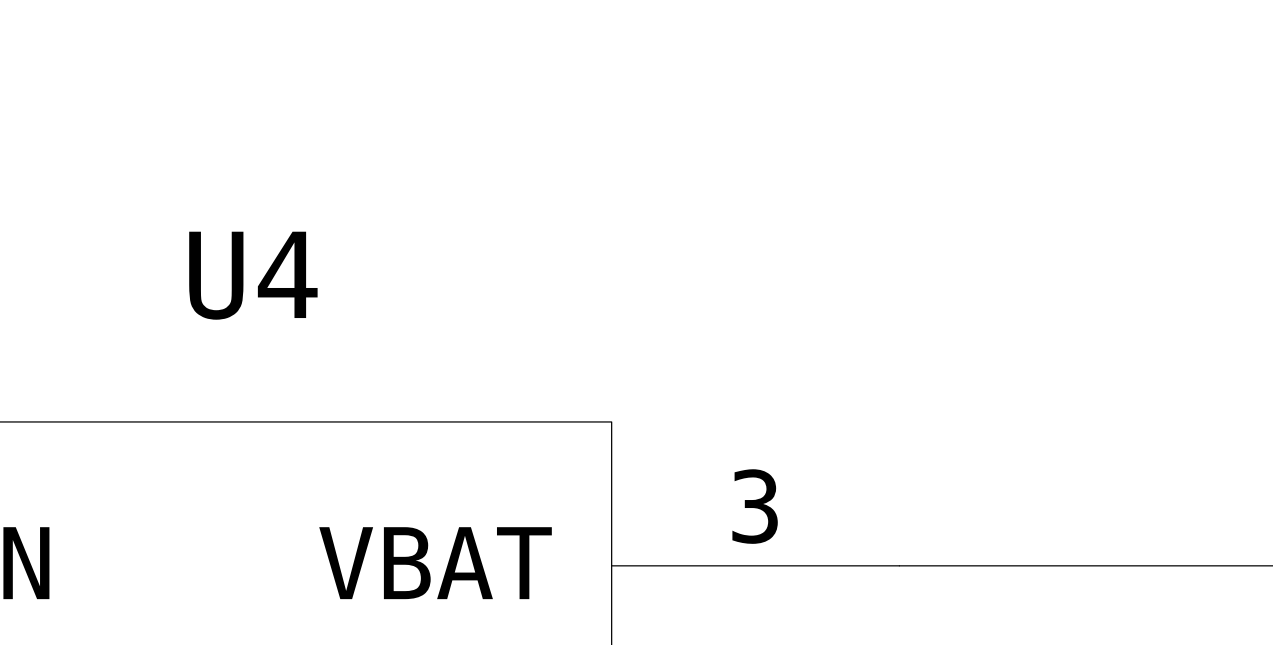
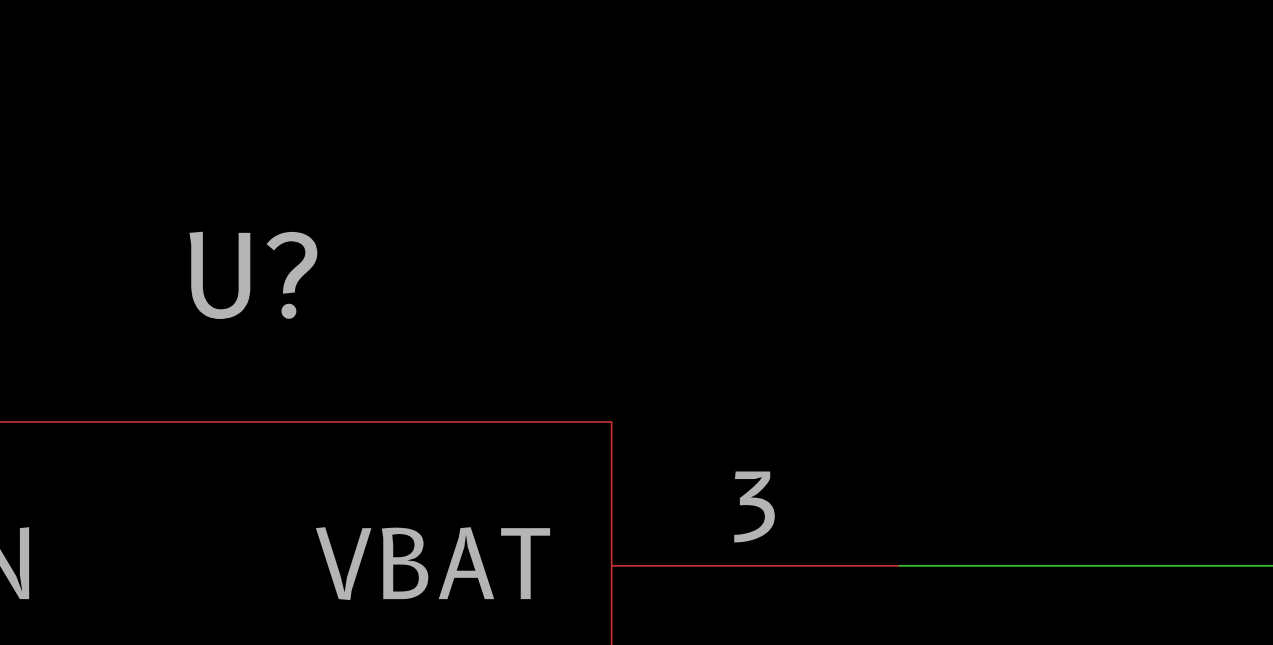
U4 name: U4 (253, 275) -> U? (253, 275)

